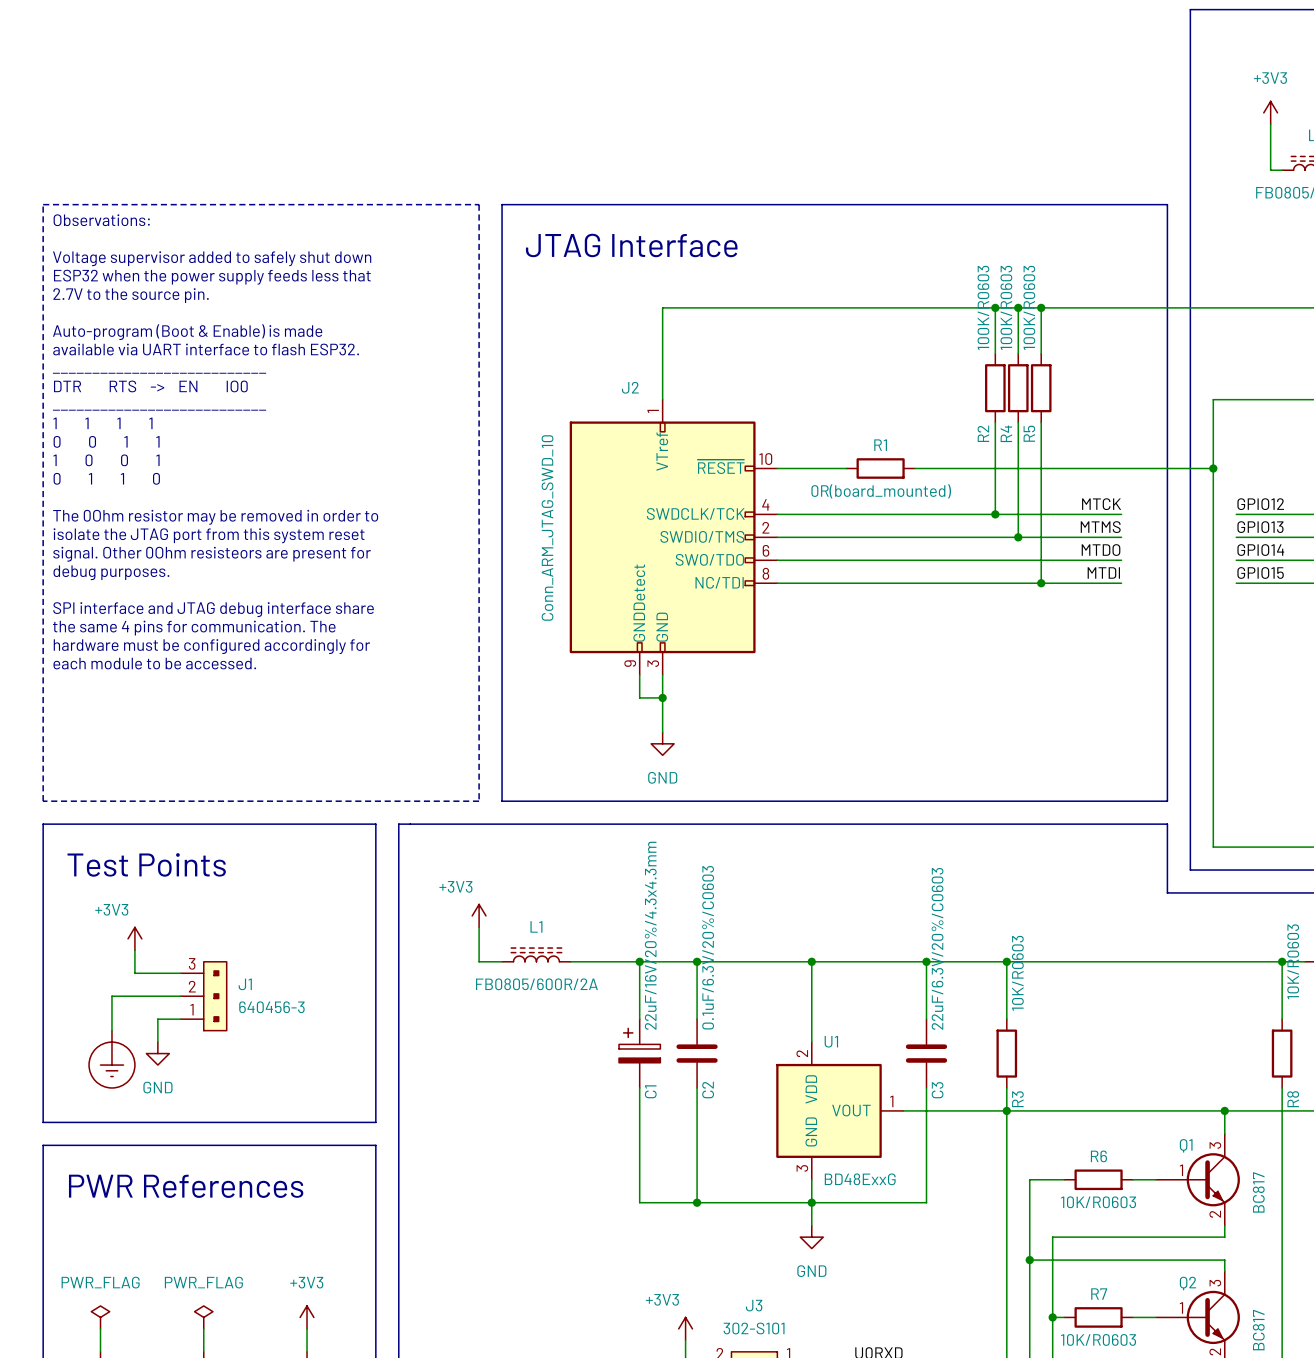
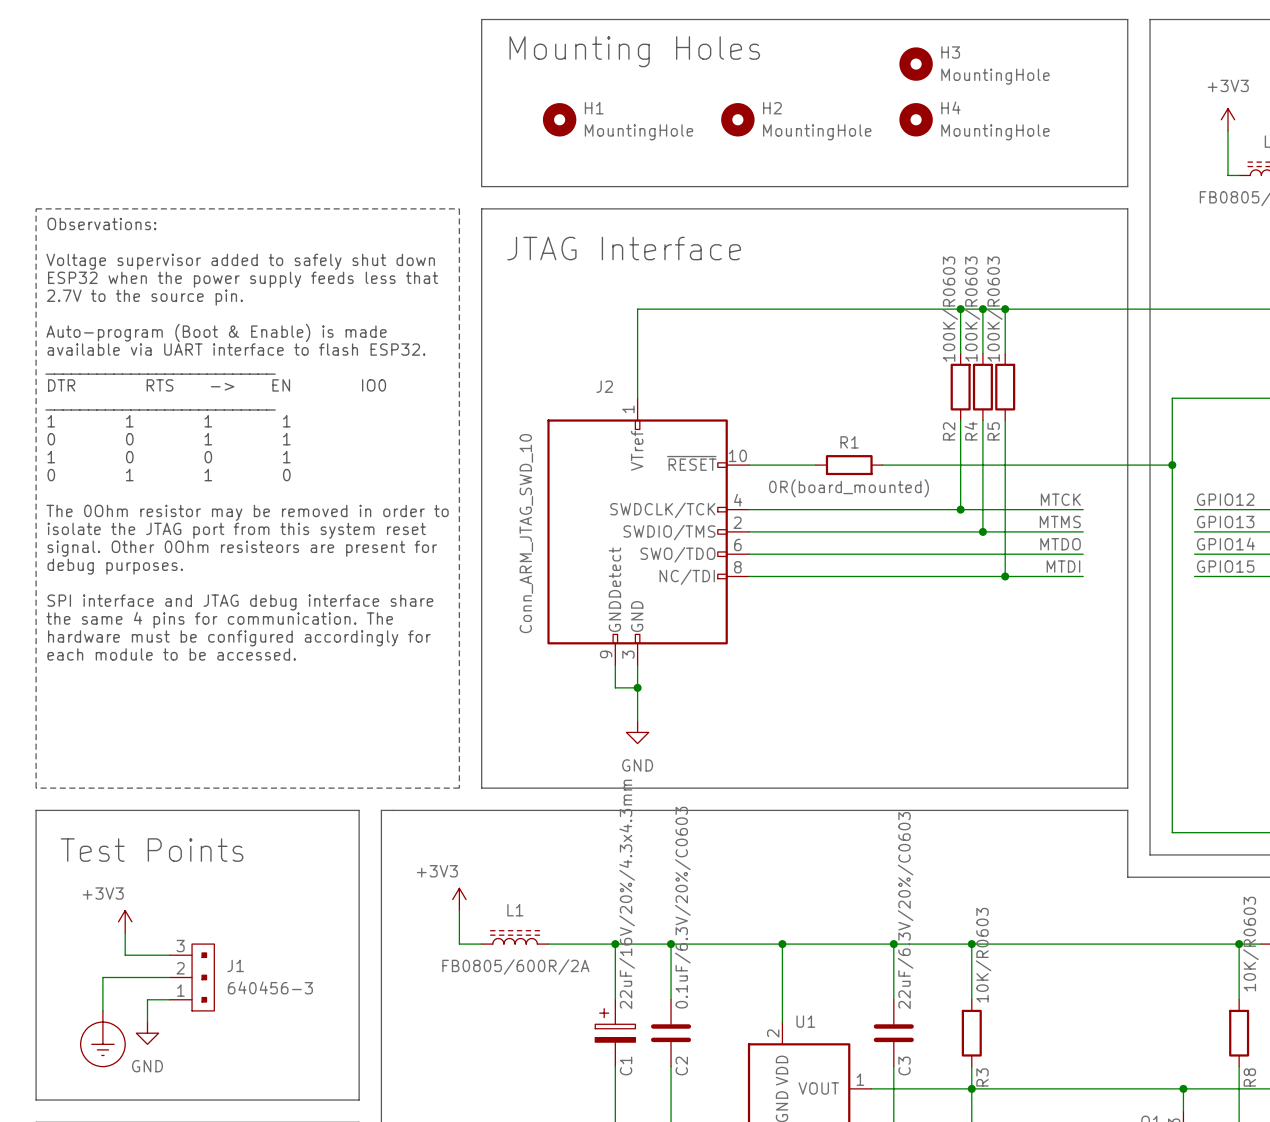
line: none -> (481, 19) (1127, 19) (1127, 186) (481, 186) (481, 19)
text: none -> Mounting Holes (634, 51)
H3: none -> MountingHole (916, 64)
H1: none -> MountingHole (559, 119)
H2: none -> MountingHole (737, 119)
H4: none -> MountingHole (916, 119)

